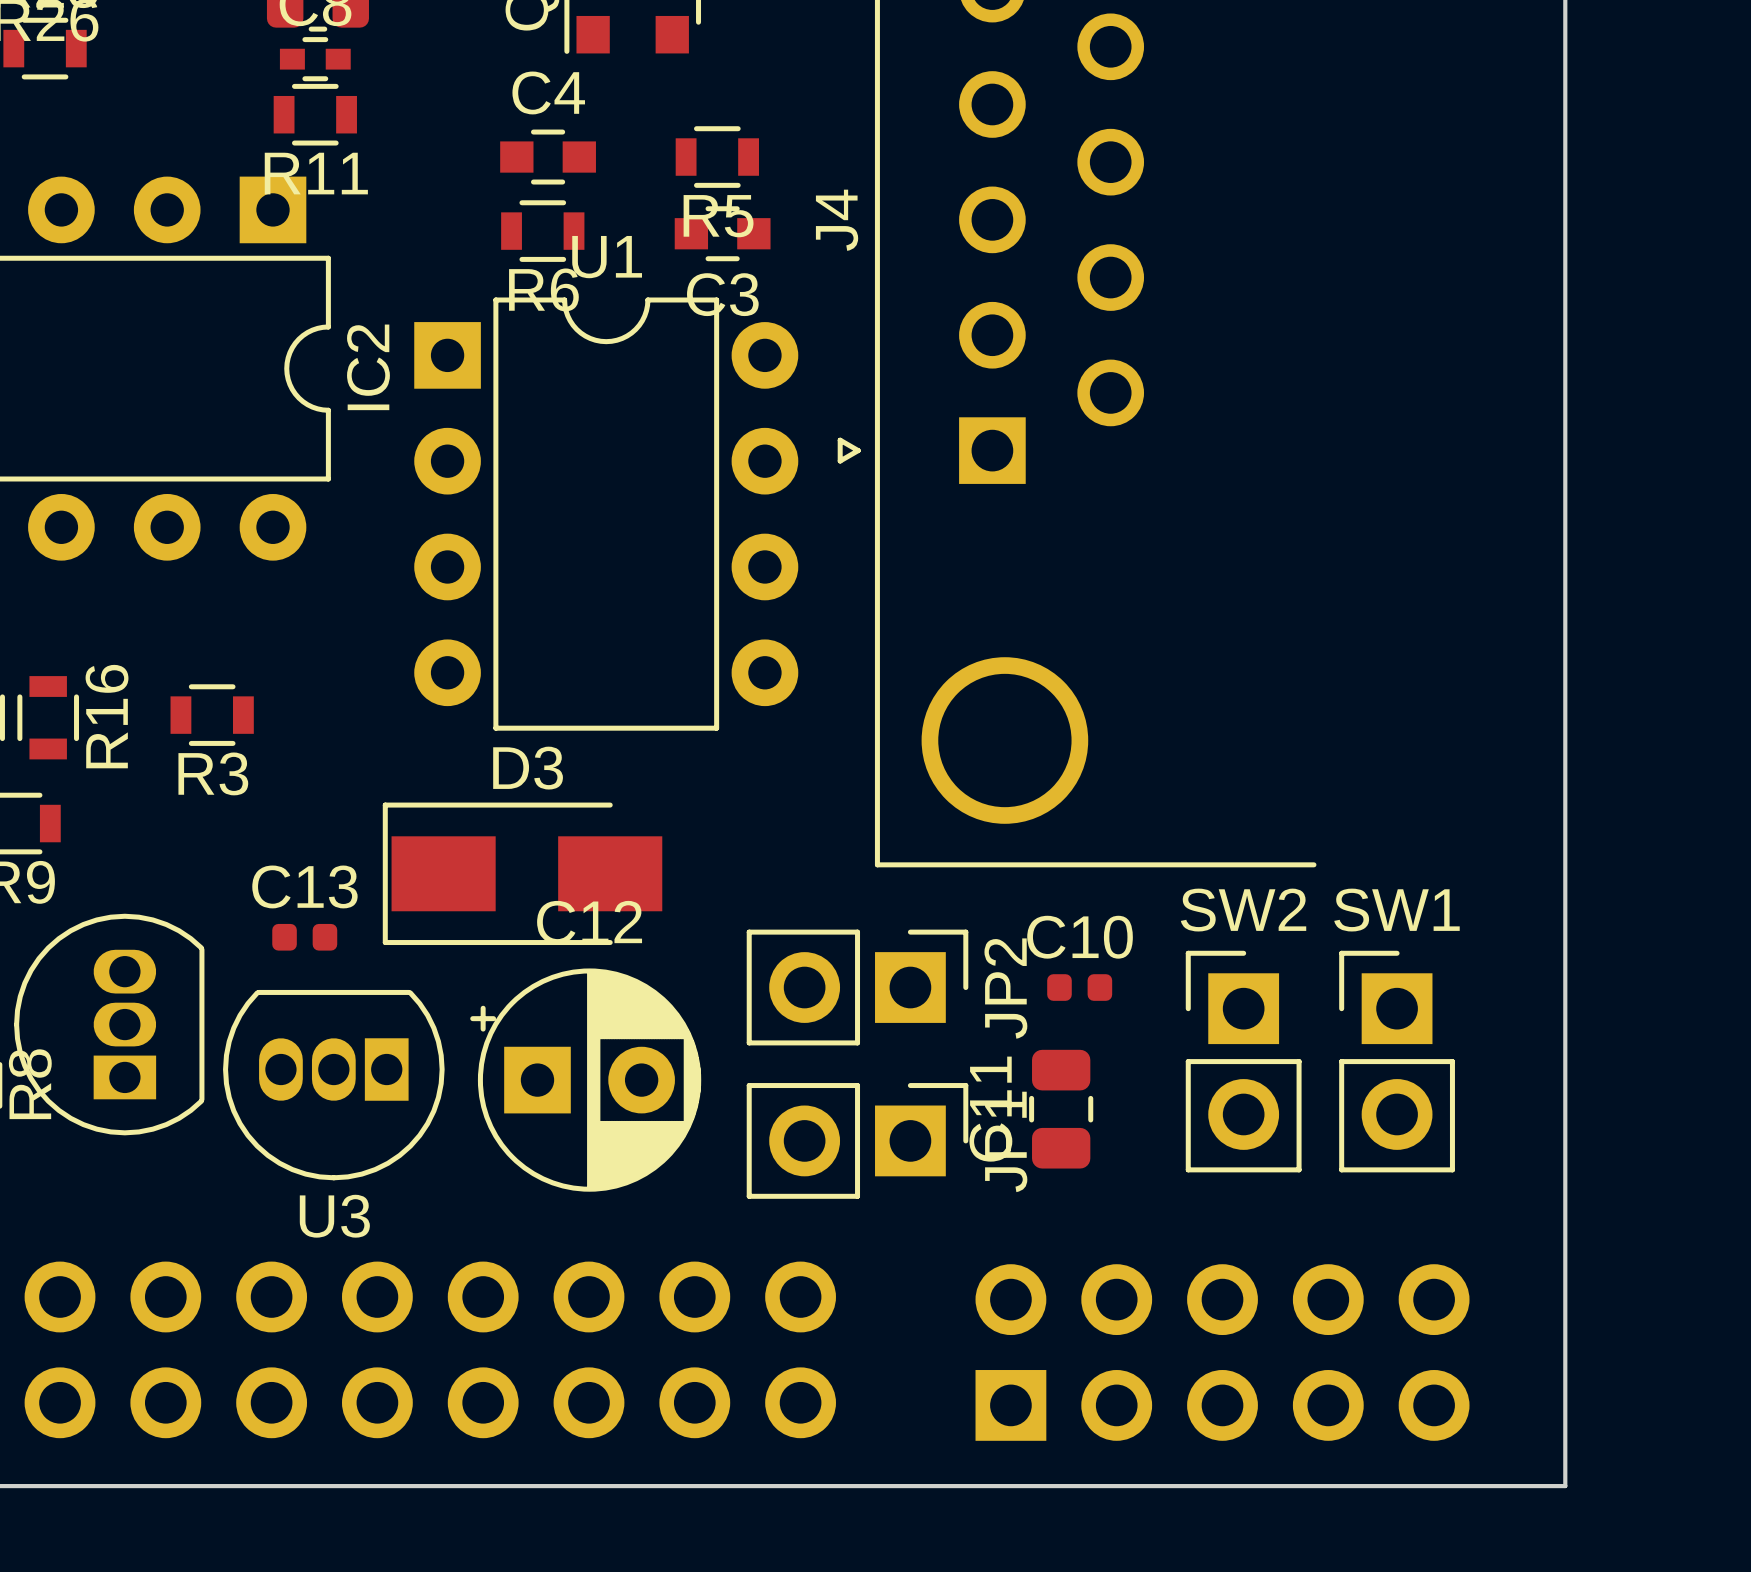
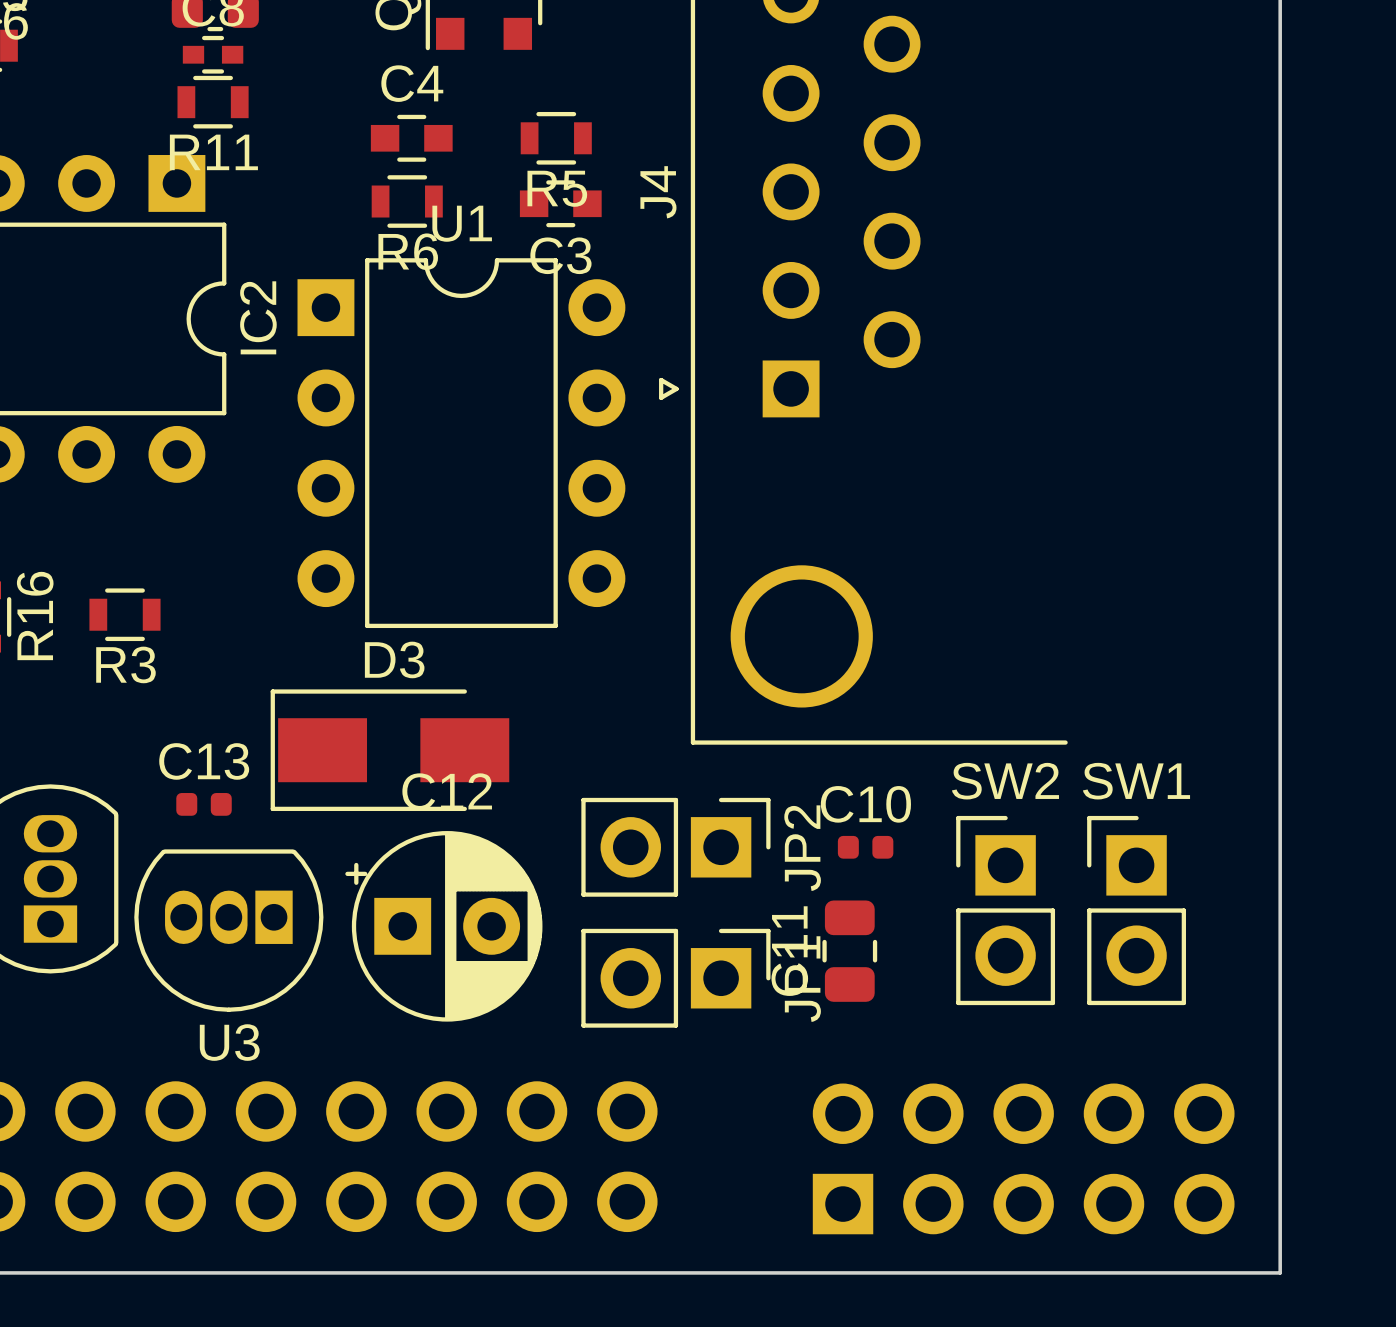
part position: (1222, 1352) -> (1023, 1158)

